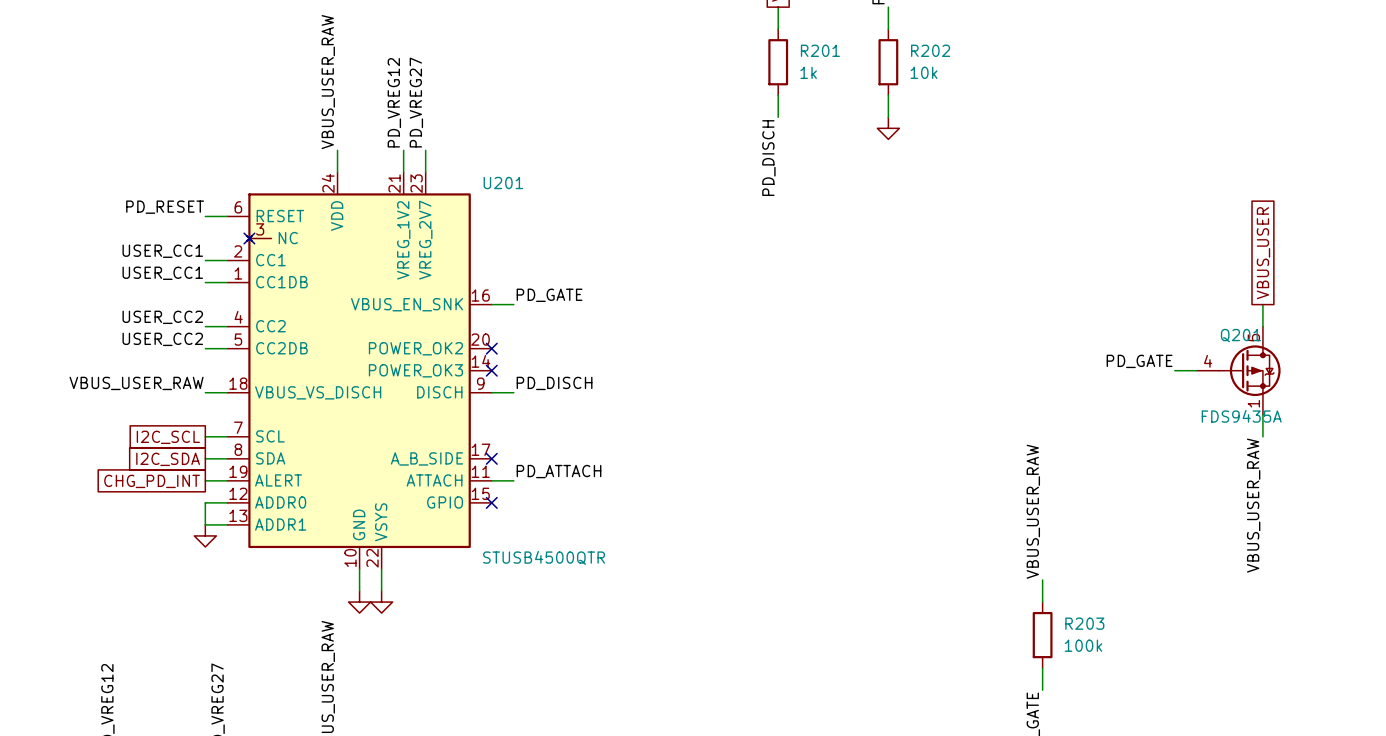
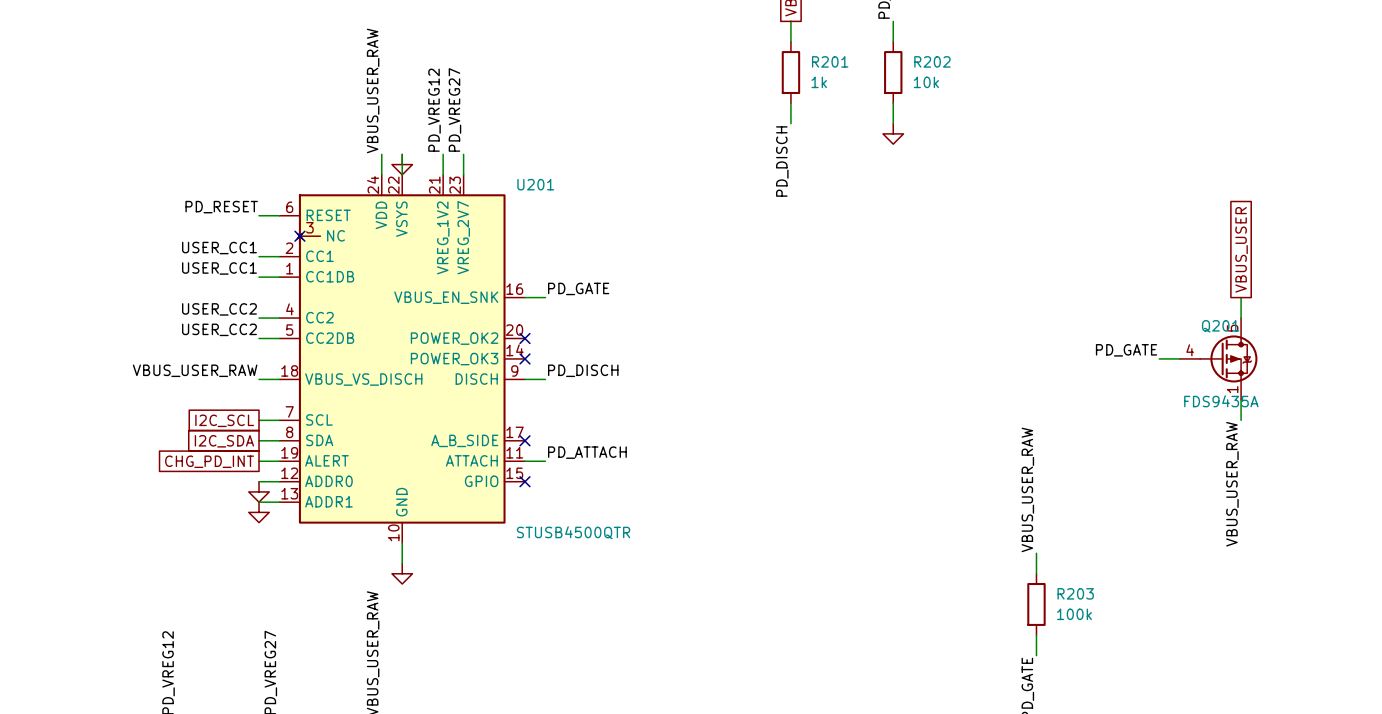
wire: none -> (402, 154) (402, 174)
power symbol: none -> (402, 164)
U201 symbol: [227, 172, 492, 570] -> [279, 174, 525, 544]
wire: (381, 569) (381, 591) -> none
power symbol position: (381, 602) -> (259, 491)

